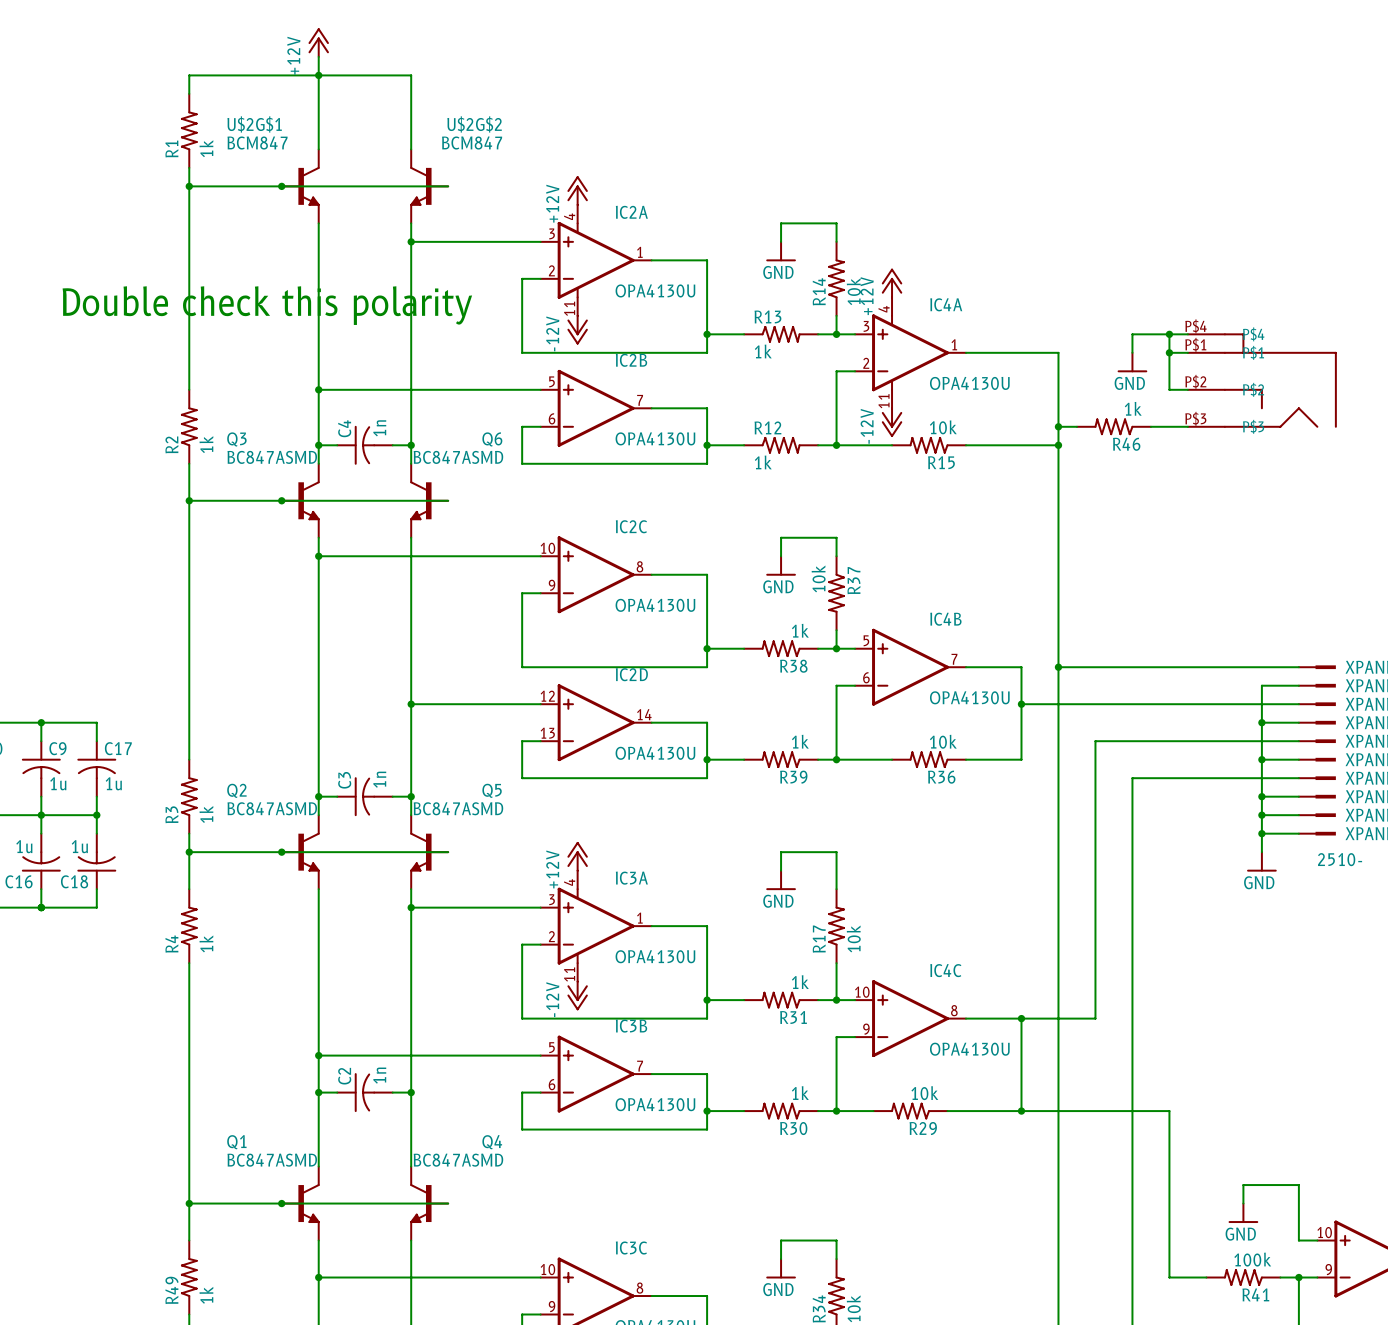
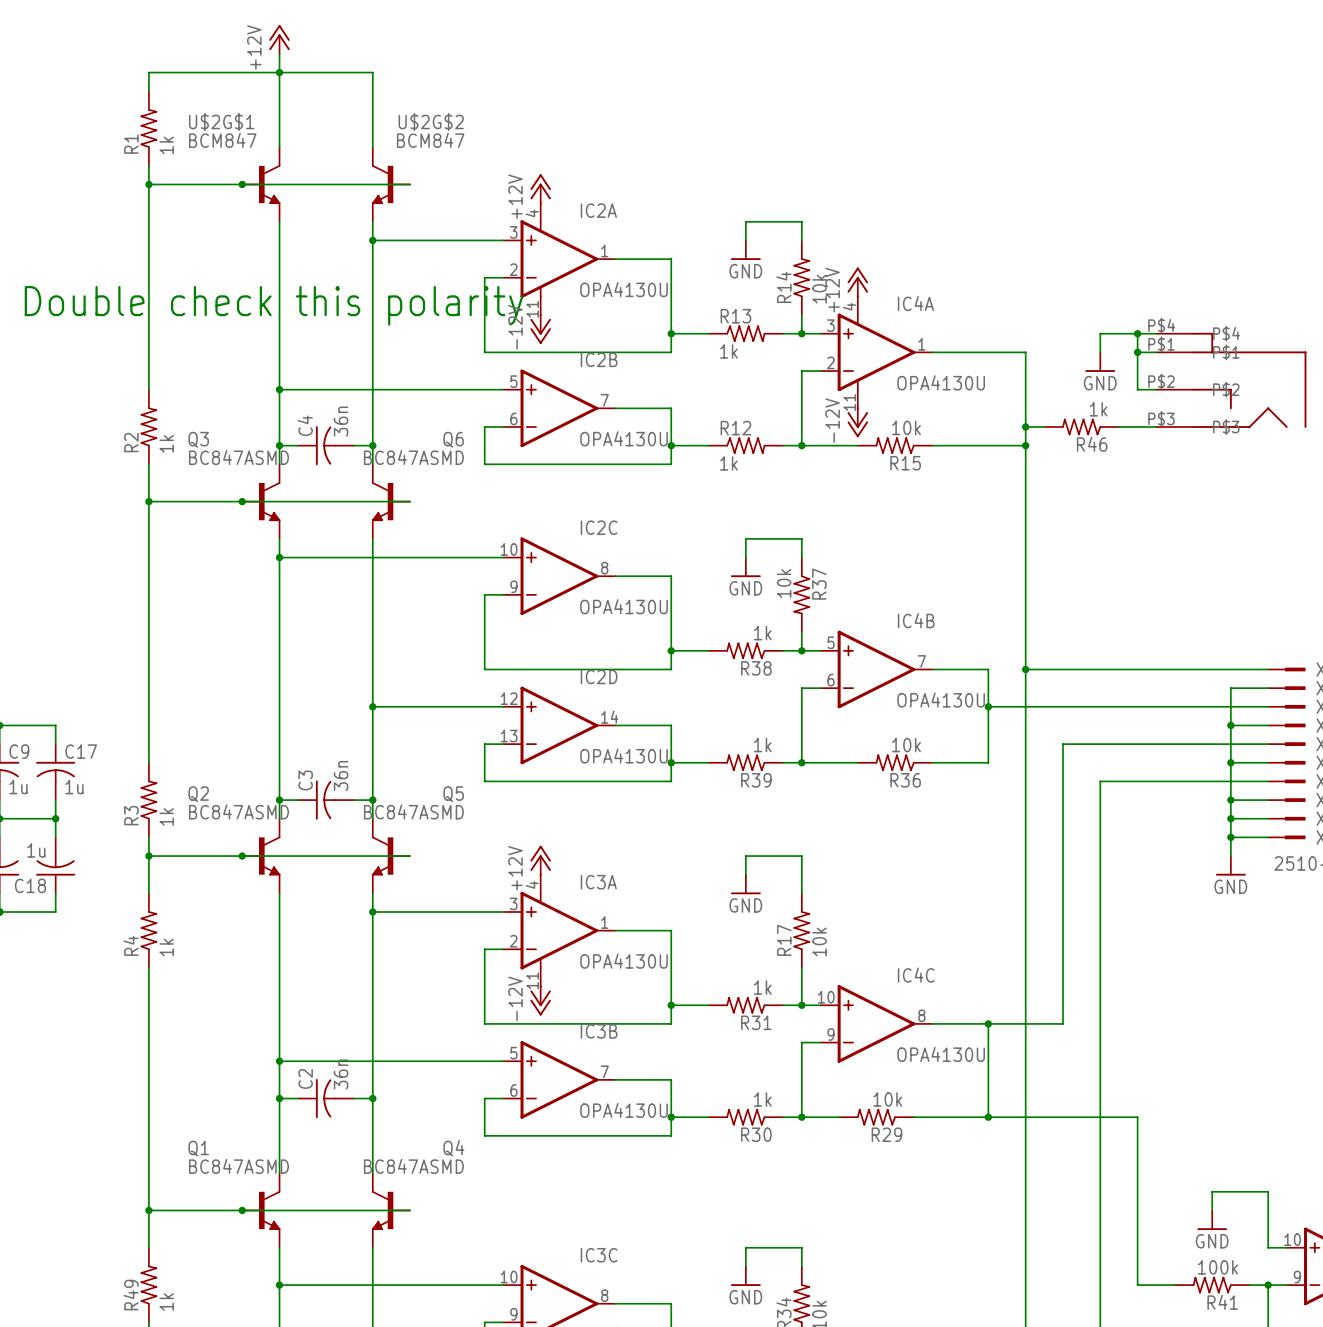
C4 value: 1n (379, 428) -> 36n (341, 421)
C3 value: 1n (379, 779) -> 36n (341, 775)
C2 value: 1n (379, 1075) -> 36n (341, 1074)

